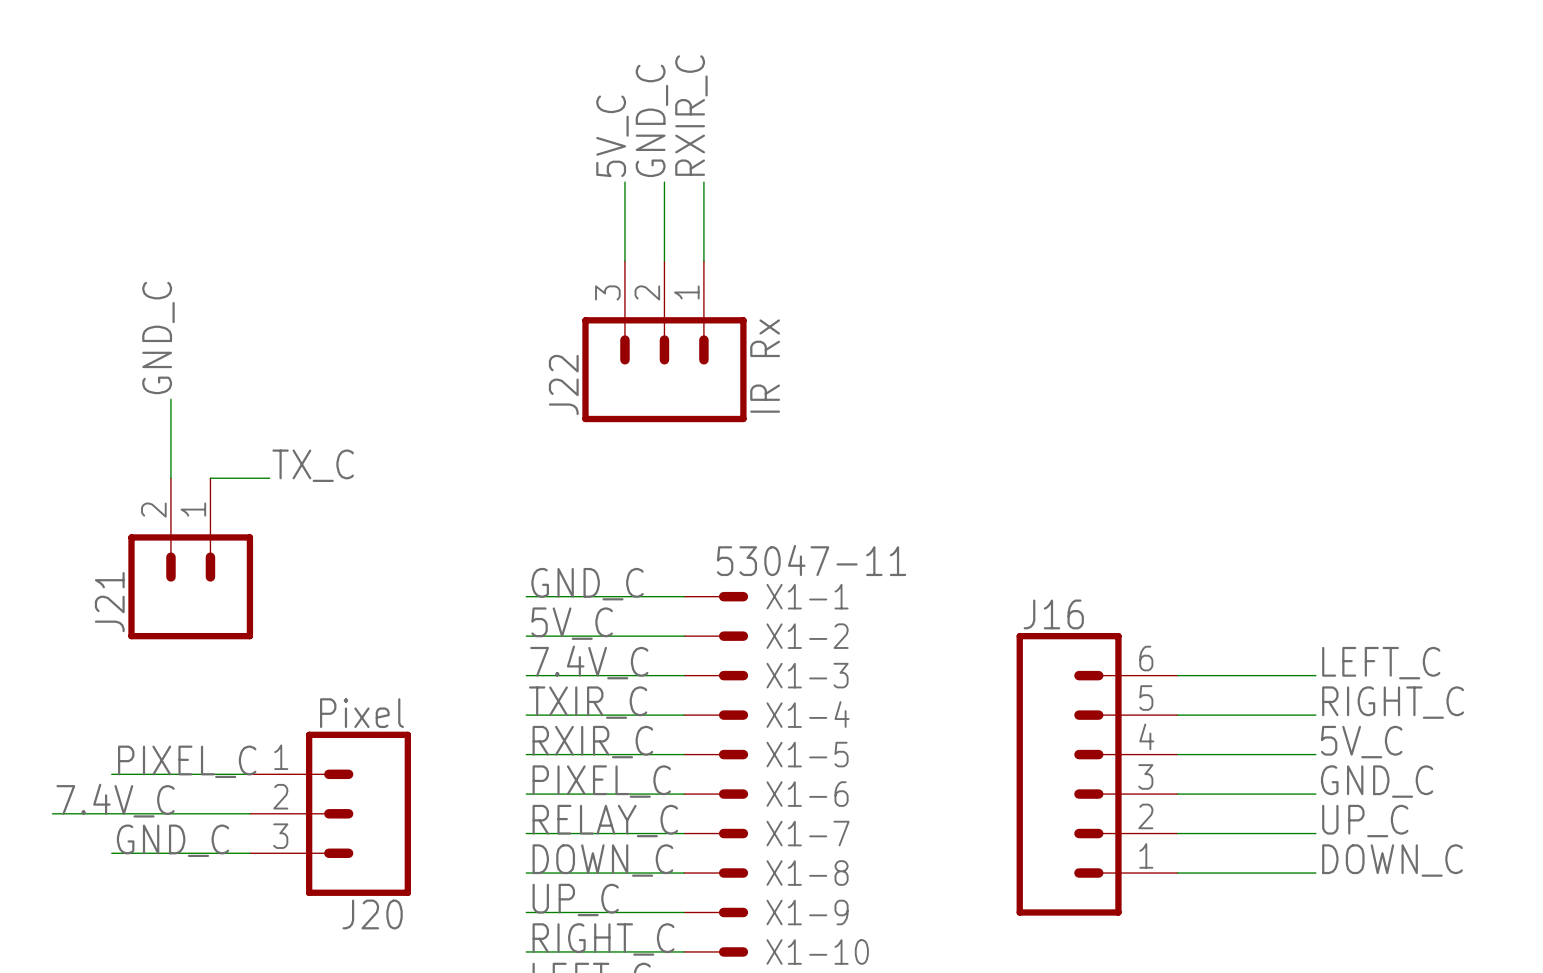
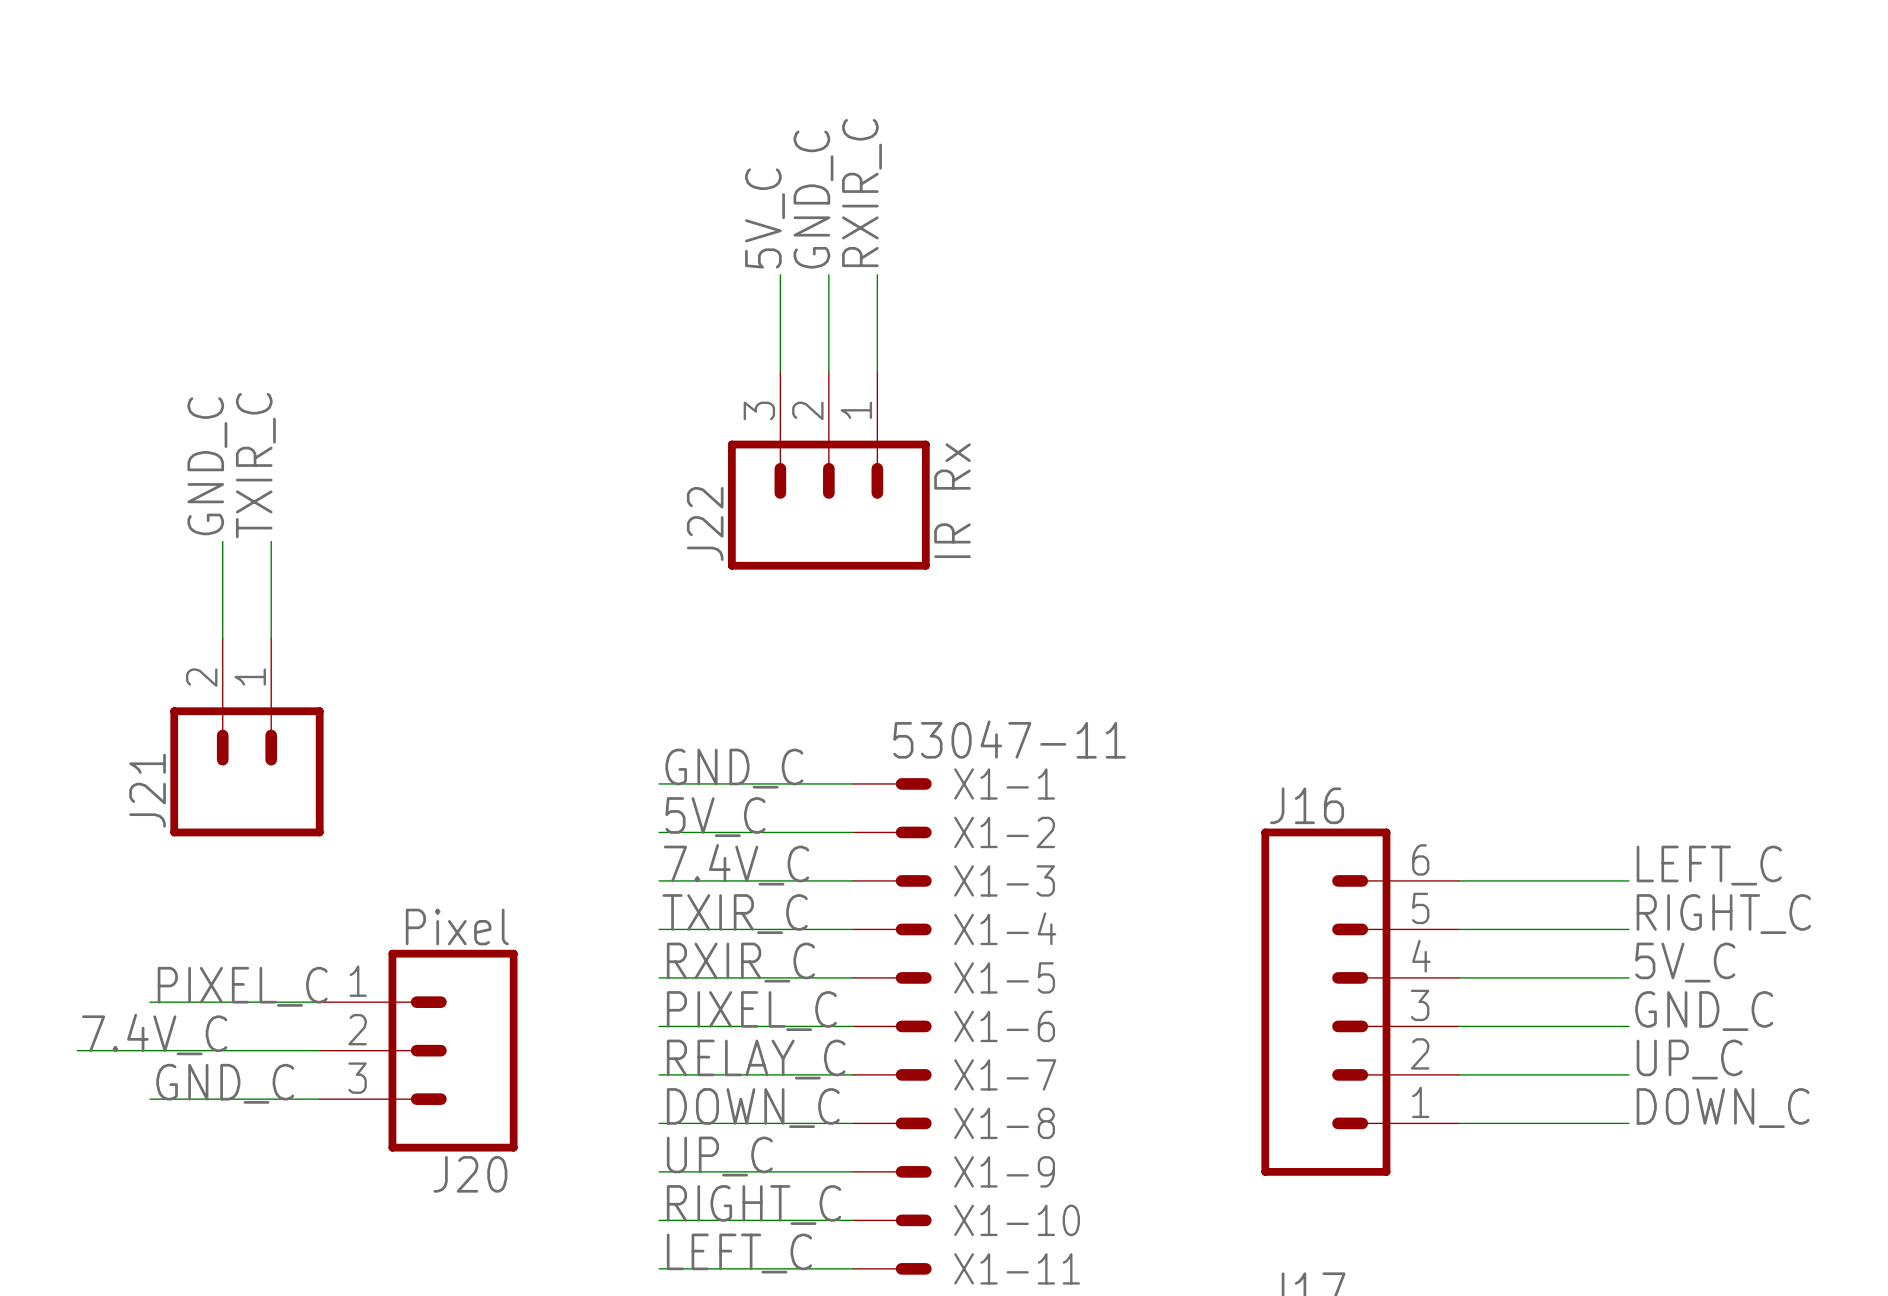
label: none -> TXIR_C (255, 465)
label: TX_C (313, 465) -> none
wire: (210, 478) (269, 478) -> (271, 638) (271, 541)

